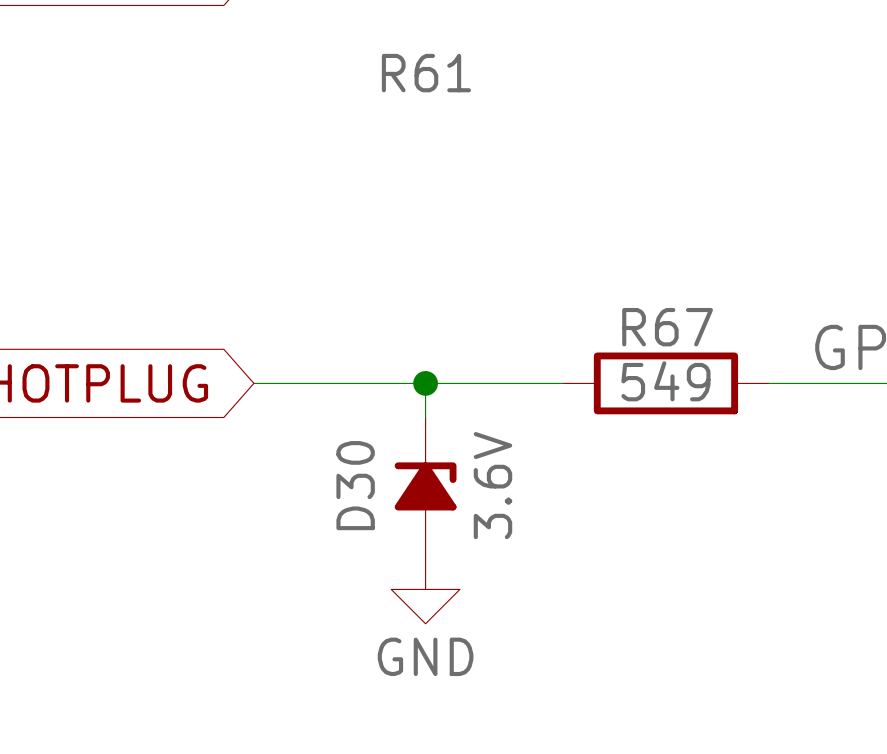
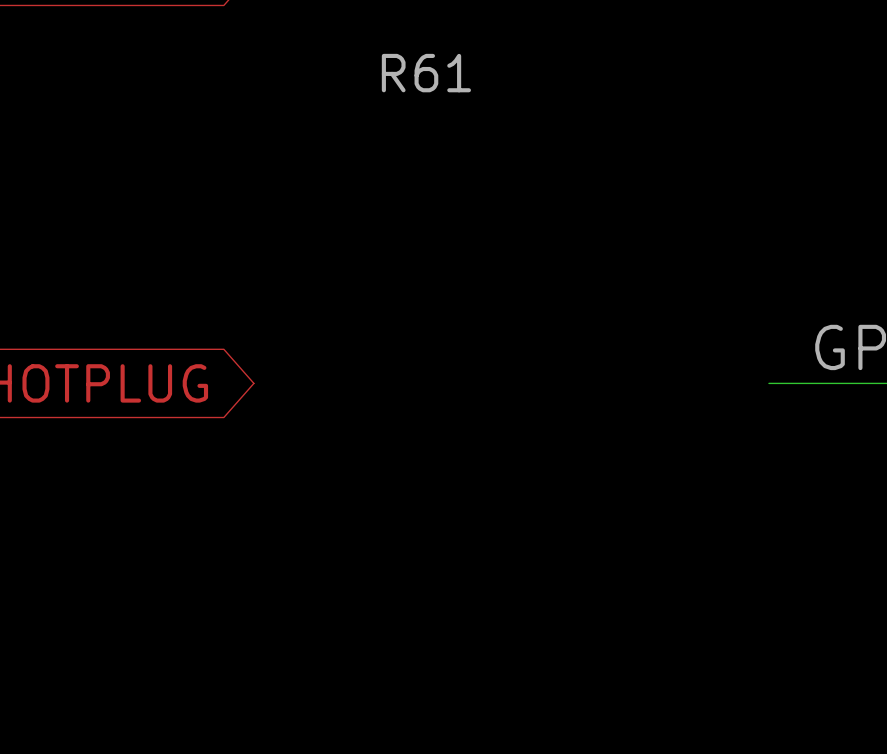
wire: (253, 383) (562, 383) -> none
wire: (425, 383) (425, 417) -> none
junction: (425, 383) -> none
R67: 549 (665, 383) -> none
D30: 3.6V (425, 486) -> none
power symbol: GND (425, 589) -> none

